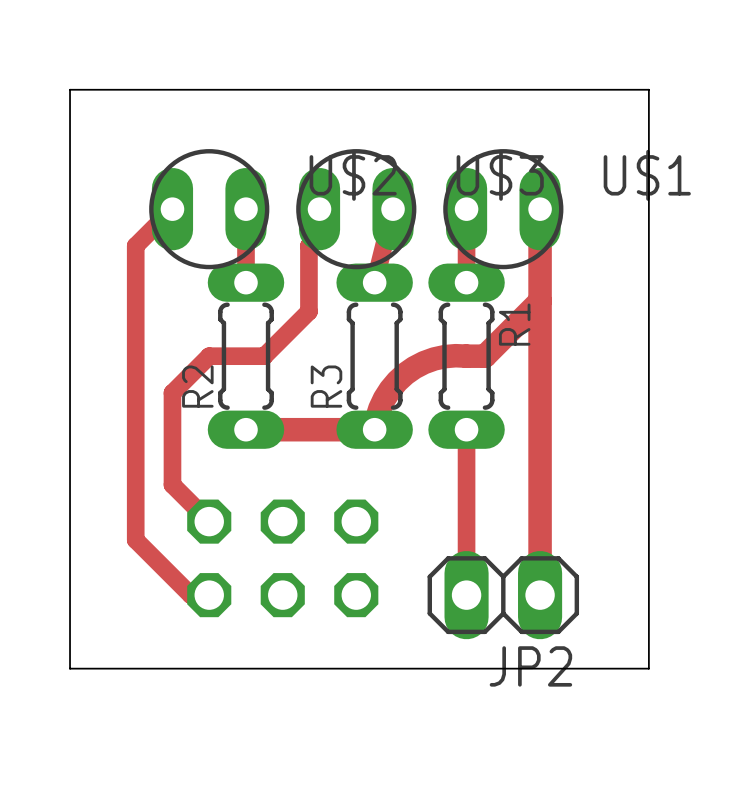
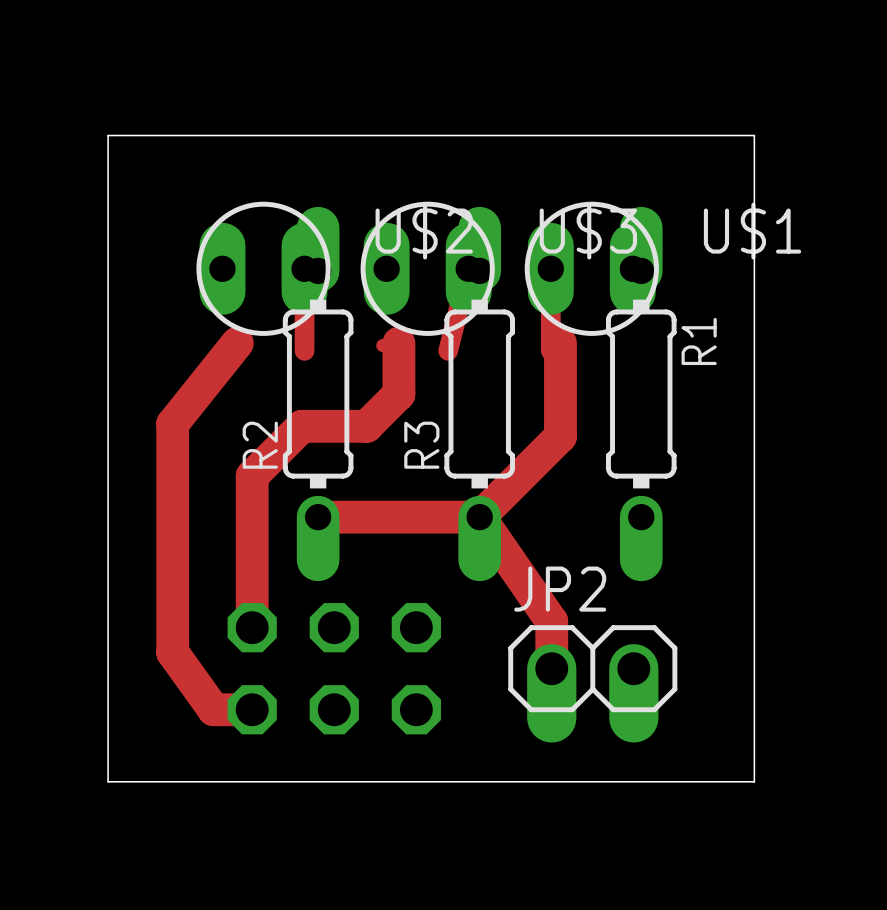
track: (172, 209) (135, 245) (135, 539) (190, 595) (209, 595) -> none
track: (319, 209) (319, 235) (308, 245) (308, 311) (264, 356) (209, 356) (172, 392) (172, 484) (209, 521) -> none
track: (540, 209) (540, 595) -> none
R2 footprint: [207, 263, 285, 449] -> [282, 206, 354, 582]
R3 footprint: [336, 263, 413, 449] -> [444, 206, 515, 582]
R1 footprint: [428, 263, 505, 449] -> [605, 206, 677, 582]
track: none -> (237, 343) (172, 423) (172, 652) (213, 709) (252, 709)
track: none -> (560, 343) (560, 436) (479, 517)
track: none -> (382, 345) (398, 343) (398, 394) (366, 426) (301, 426) (252, 476) (252, 627)
track: (540, 301) (484, 356) (455, 355) (434, 358) (405, 373) (384, 398) (374, 429) (246, 429) -> none
track: (466, 429) (466, 595) -> none
track: none -> (318, 517) (479, 517)
track: none -> (479, 517) (551, 621) (551, 668)
JP2 footprint: [427, 551, 580, 640] -> [508, 625, 678, 743]
part position: (282, 558) -> (334, 668)
JP2 name position: JP2 (530, 666) -> JP2 (560, 589)

